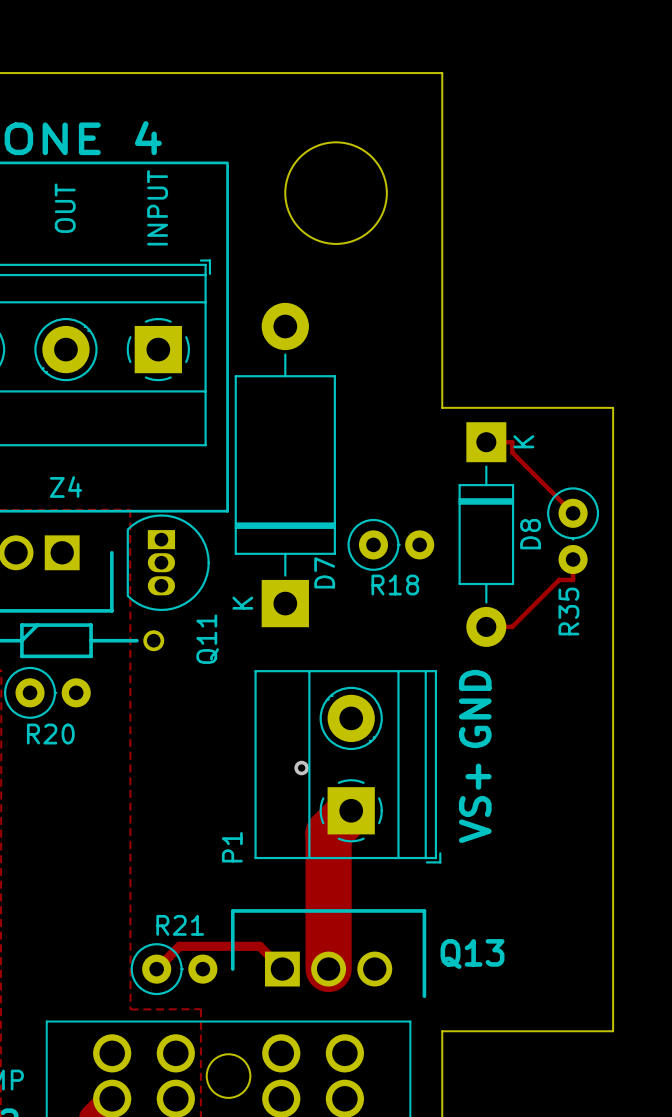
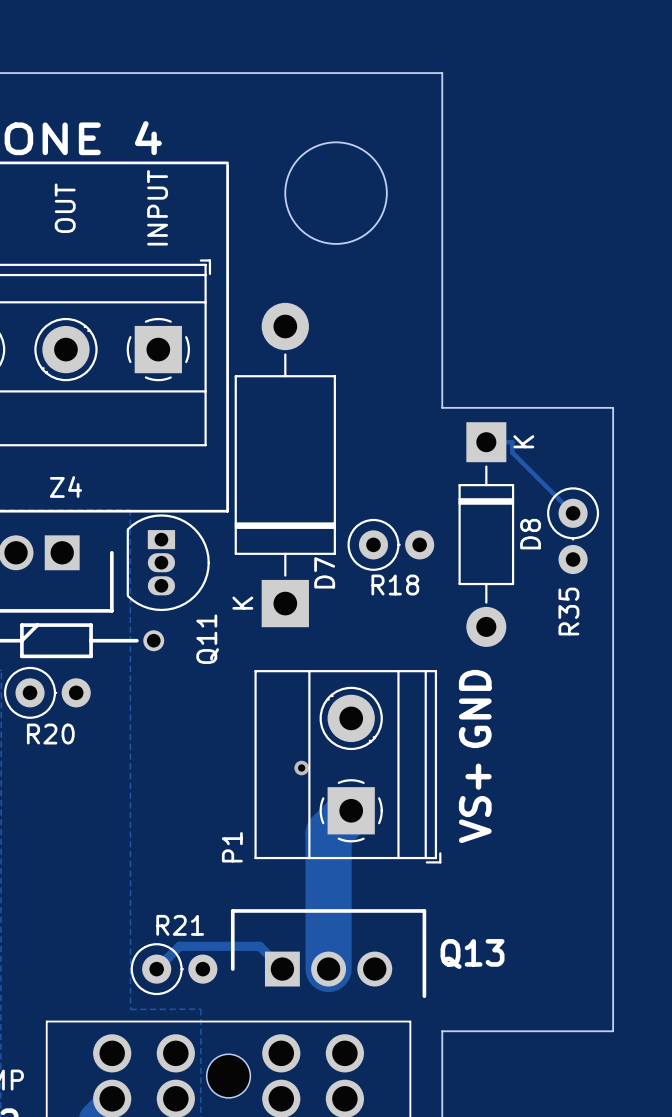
track: (573, 559) (573, 579) (559, 579) (512, 626) (486, 626) -> none

